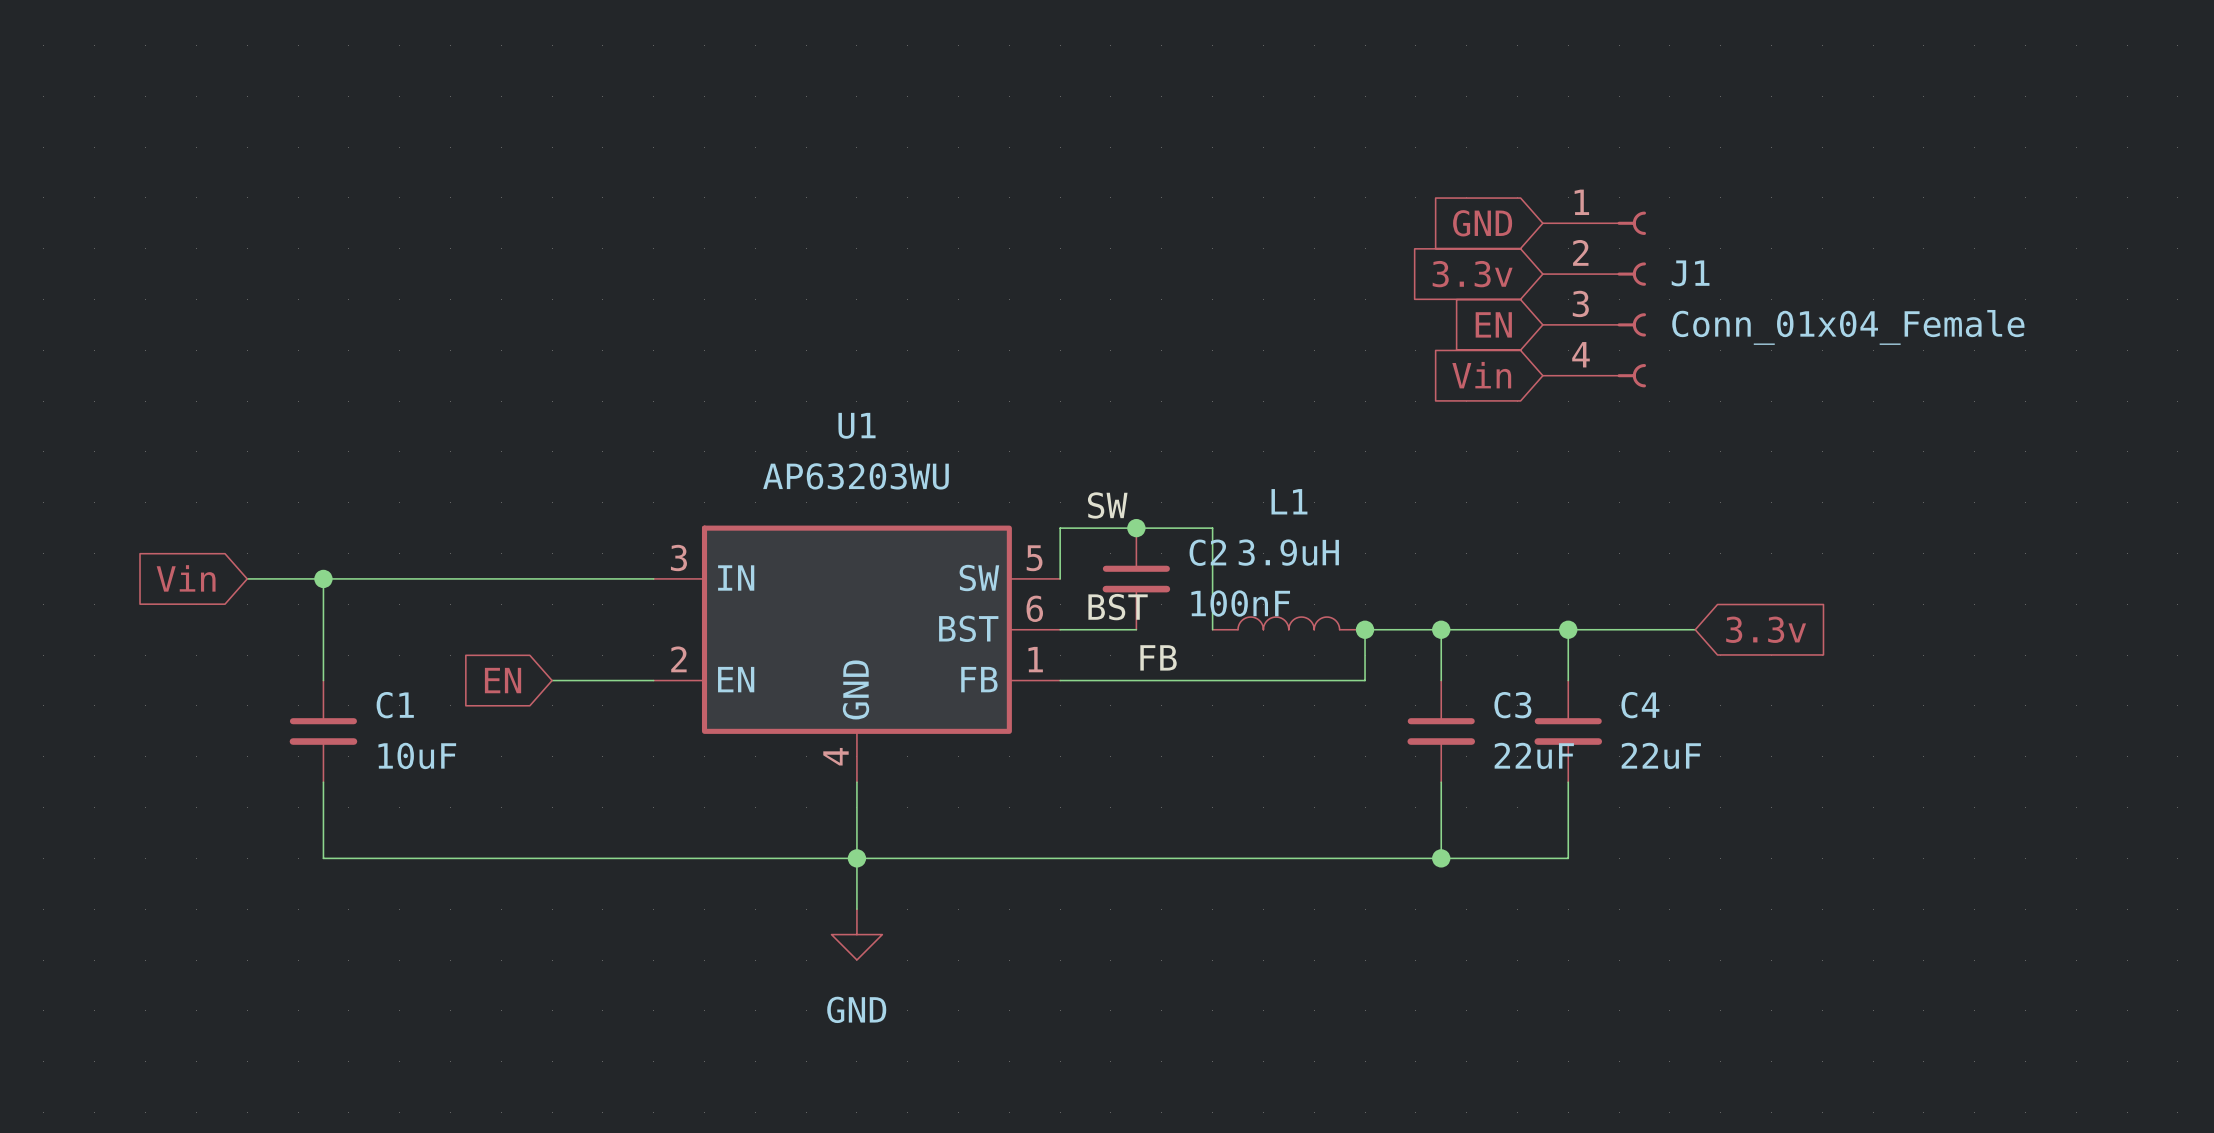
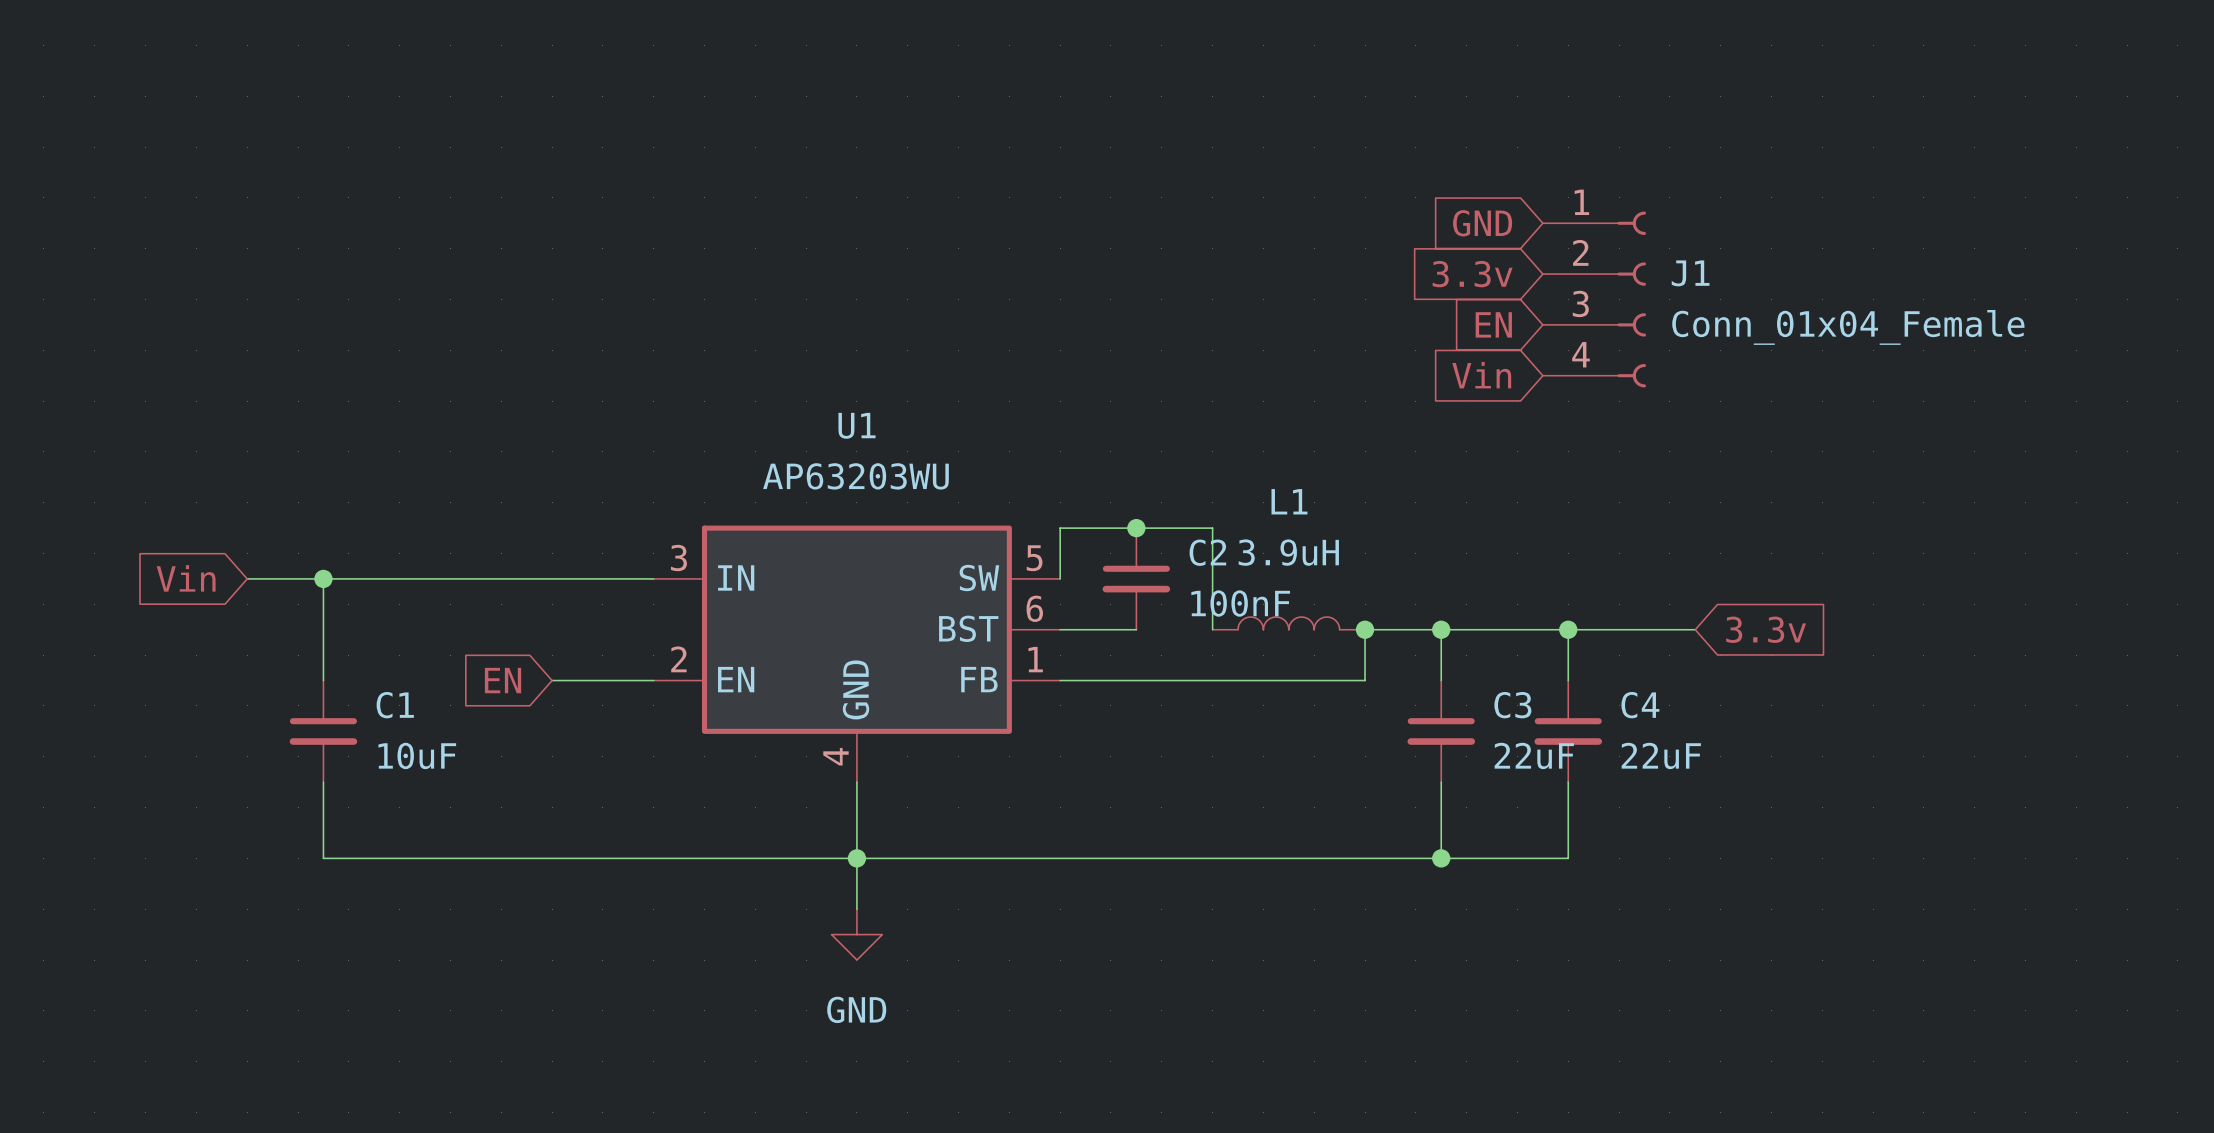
label: SW (1107, 505) -> none
label: BST (1118, 607) -> none
label: FB (1158, 657) -> none

